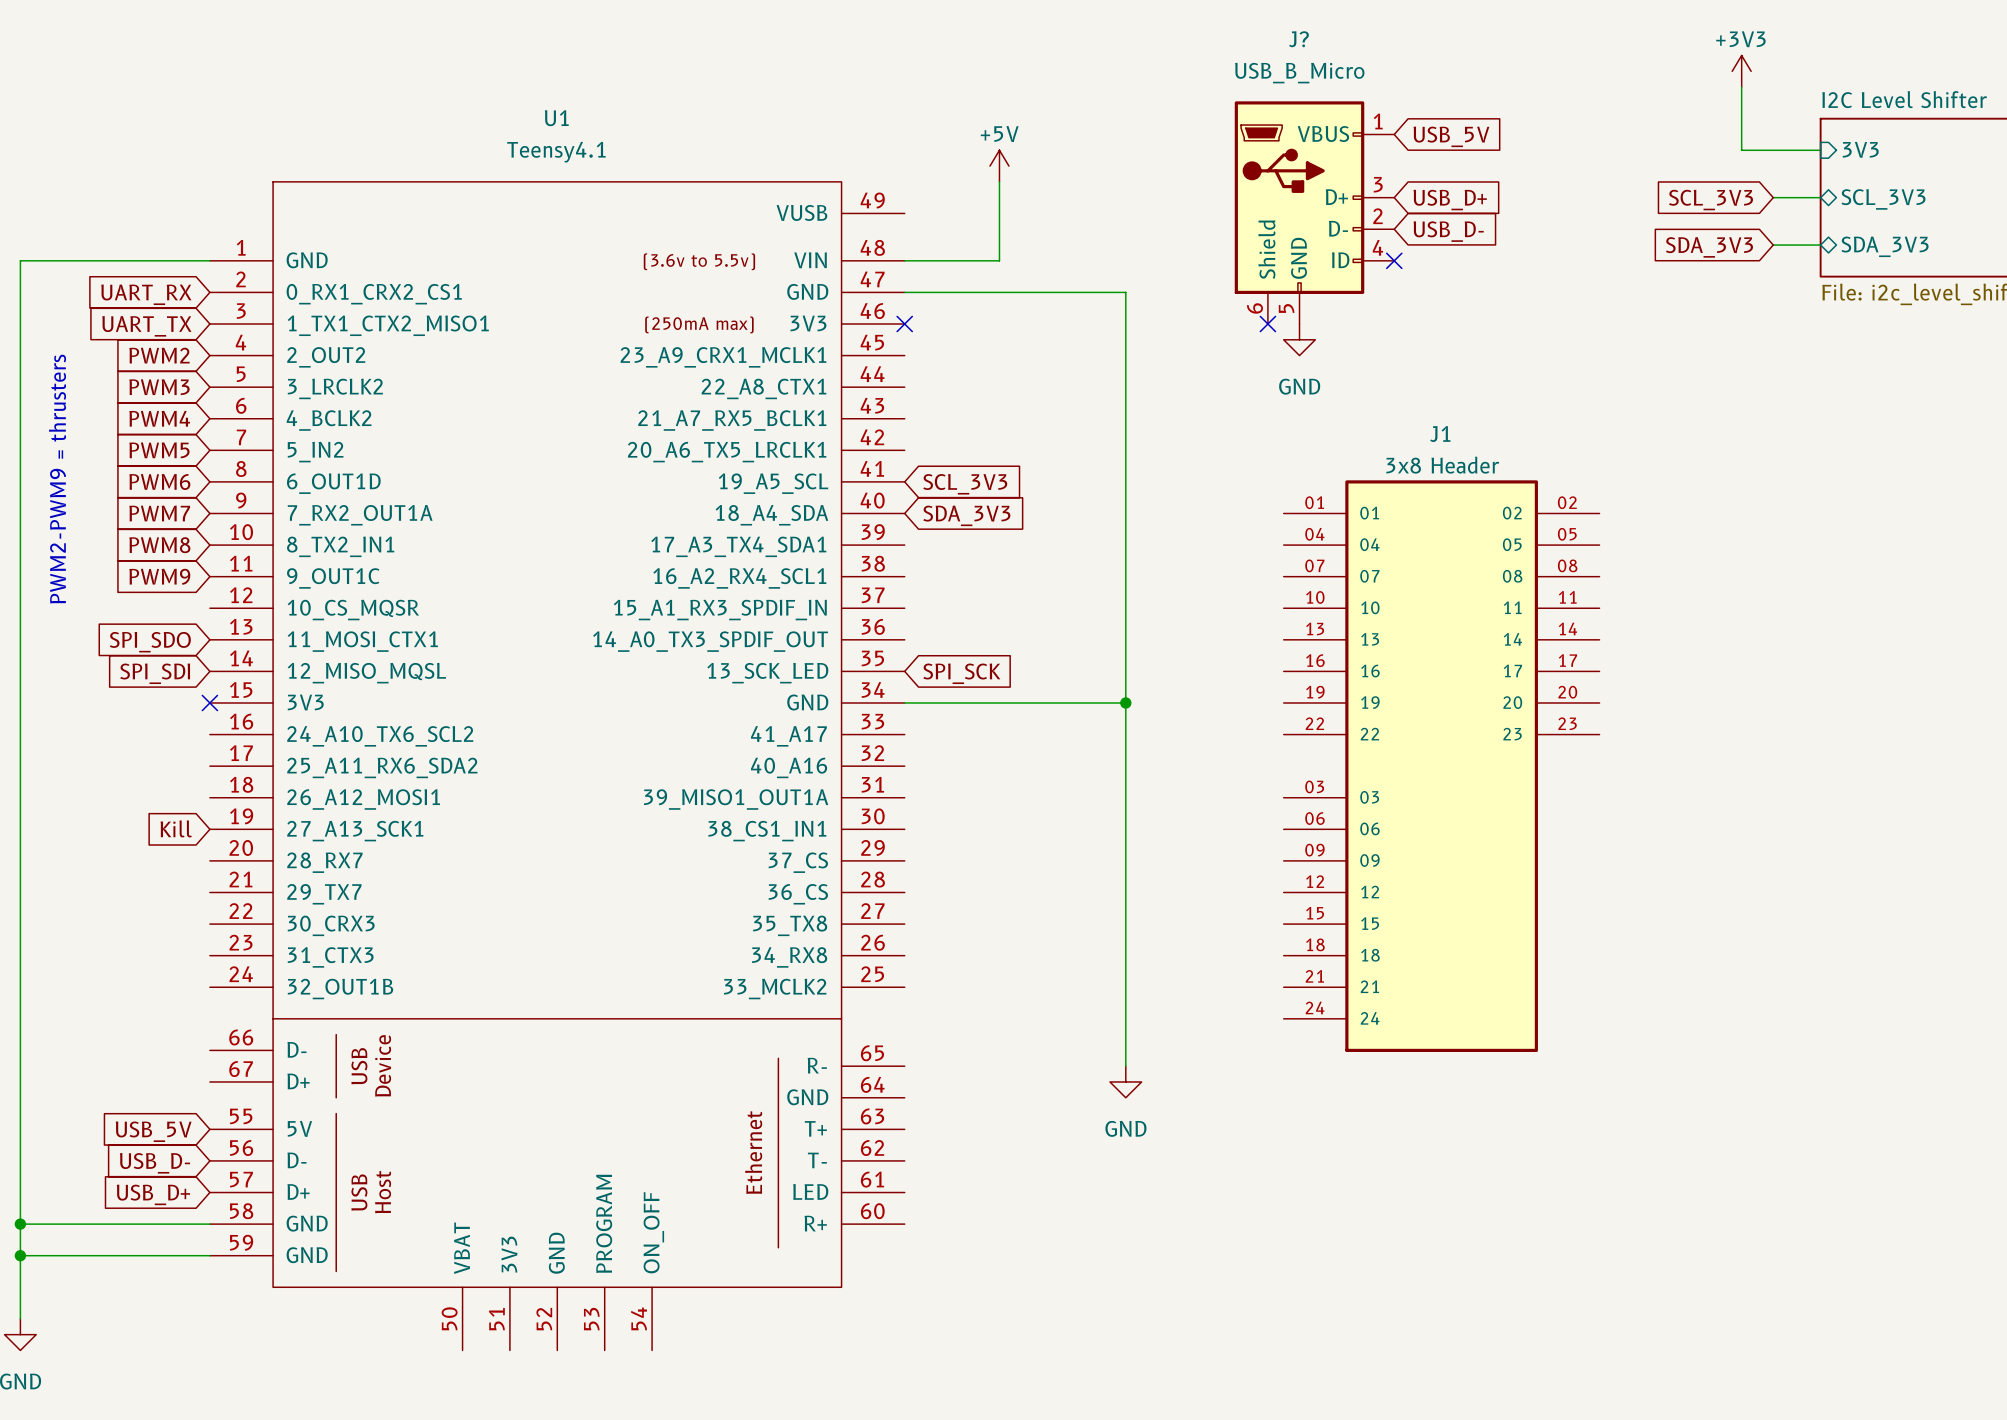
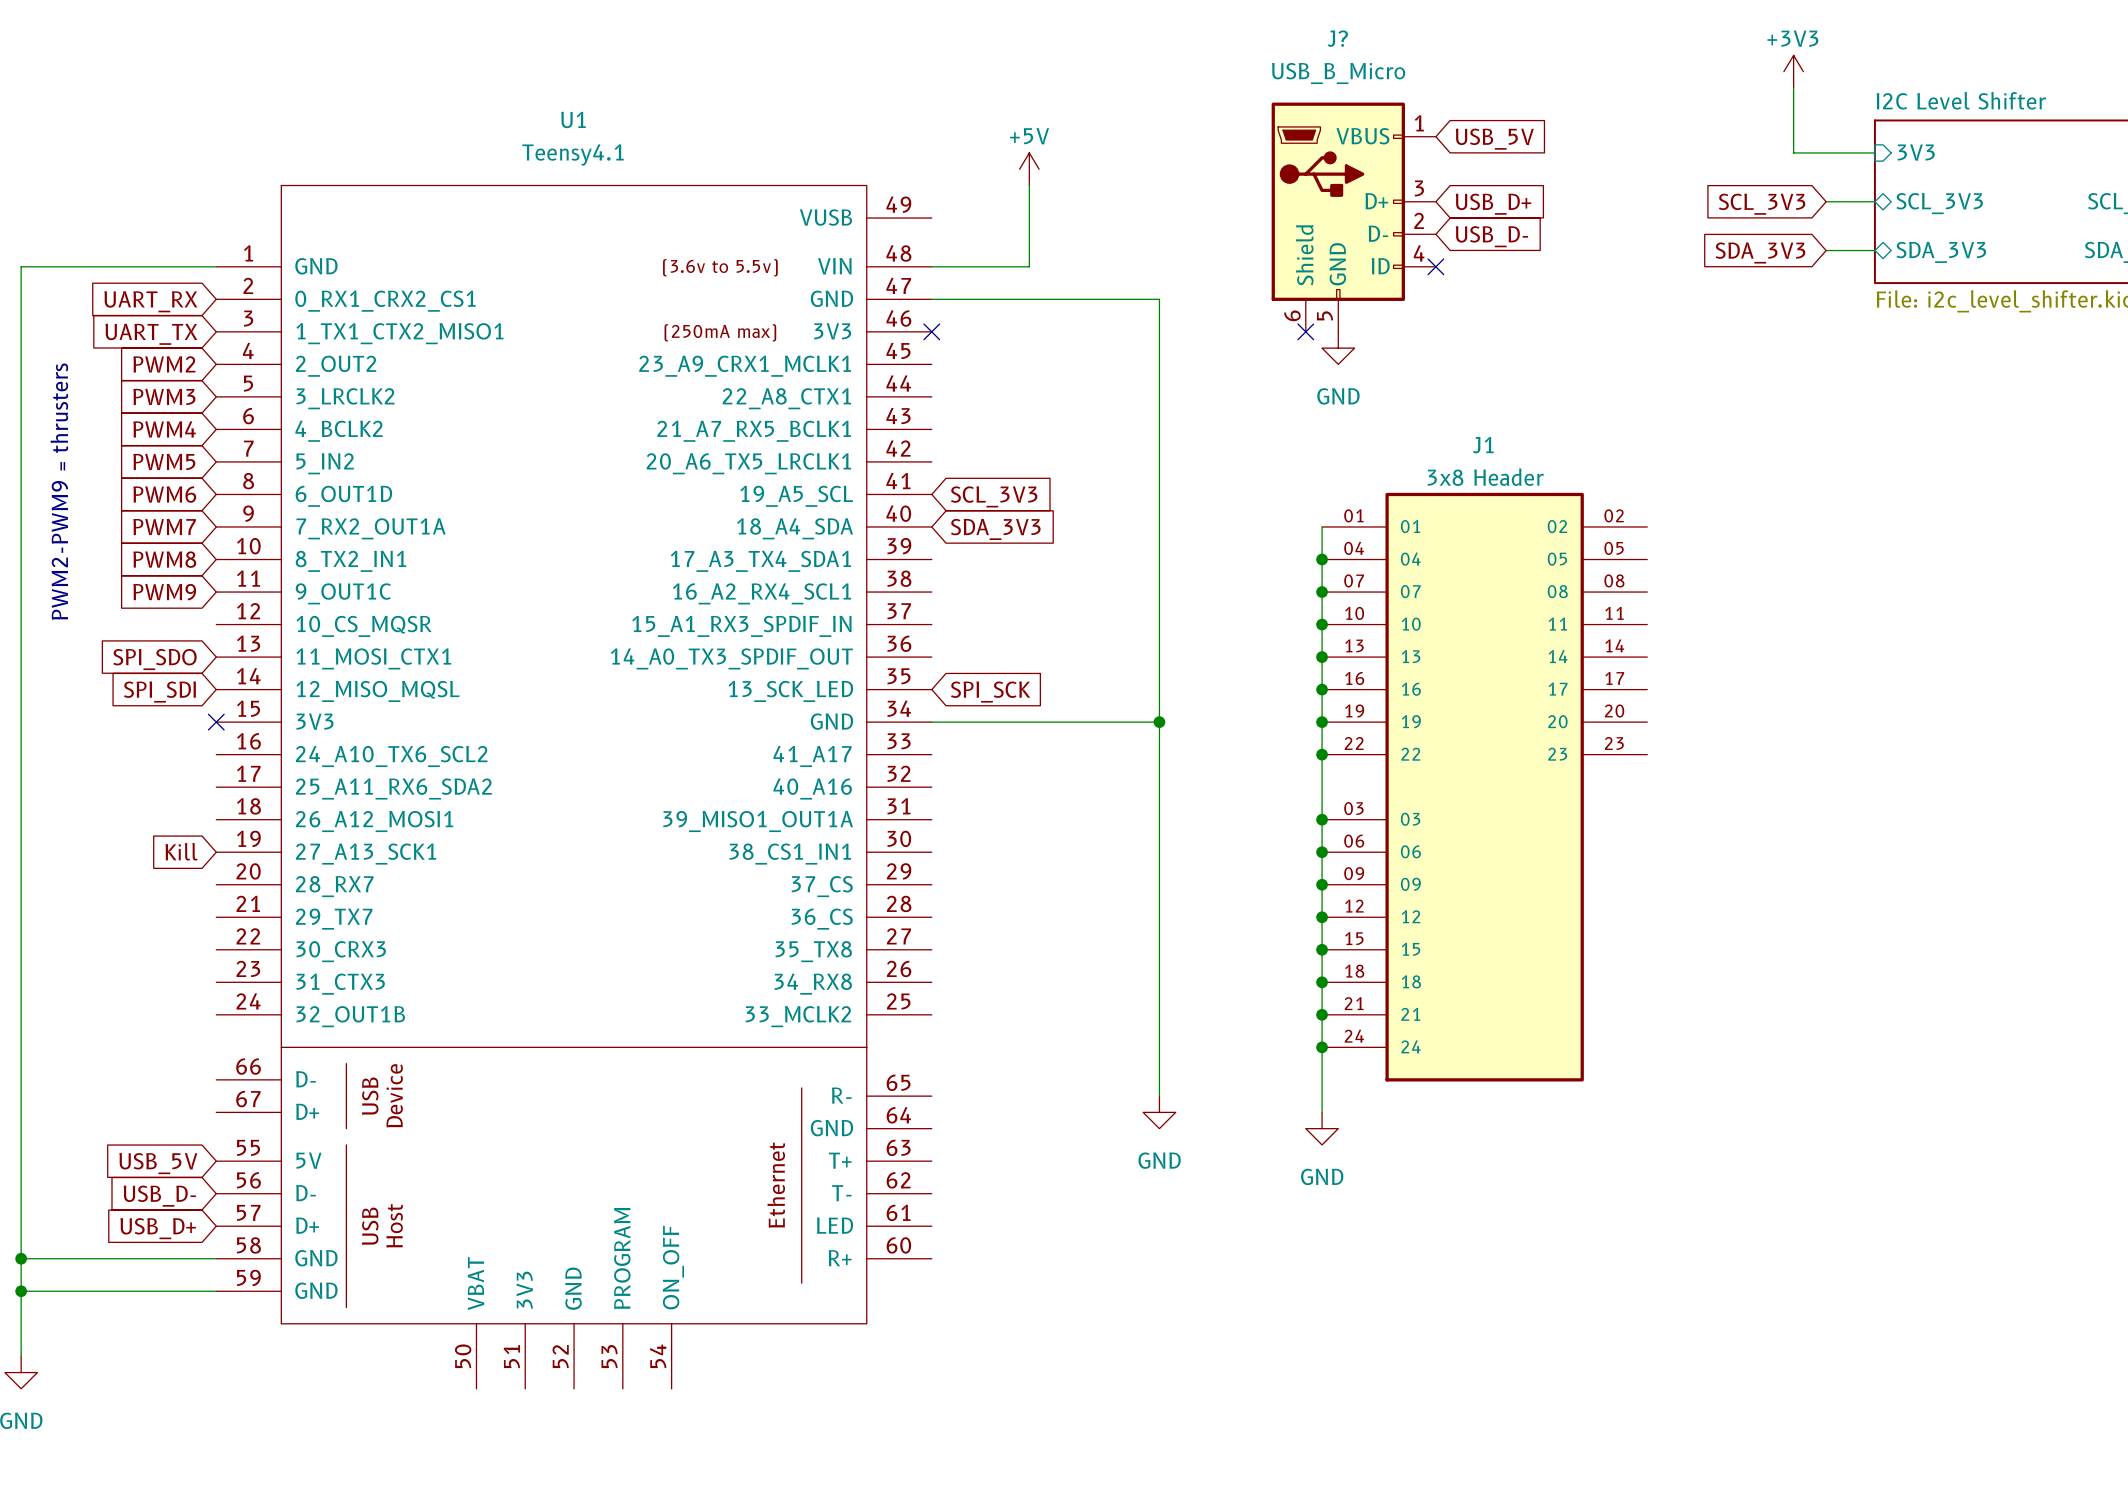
wire: none -> (1322, 526) (1322, 1112)
junction: none -> (1322, 559)
junction: none -> (1322, 592)
junction: none -> (1322, 624)
junction: none -> (1322, 657)
junction: none -> (1322, 689)
junction: none -> (1322, 722)
junction: none -> (1322, 754)
junction: none -> (1322, 819)
junction: none -> (1322, 852)
junction: none -> (1322, 884)
junction: none -> (1322, 917)
junction: none -> (1322, 949)
junction: none -> (1322, 982)
junction: none -> (1322, 1014)
junction: none -> (1322, 1047)
power symbol: none -> GND (1322, 1128)

